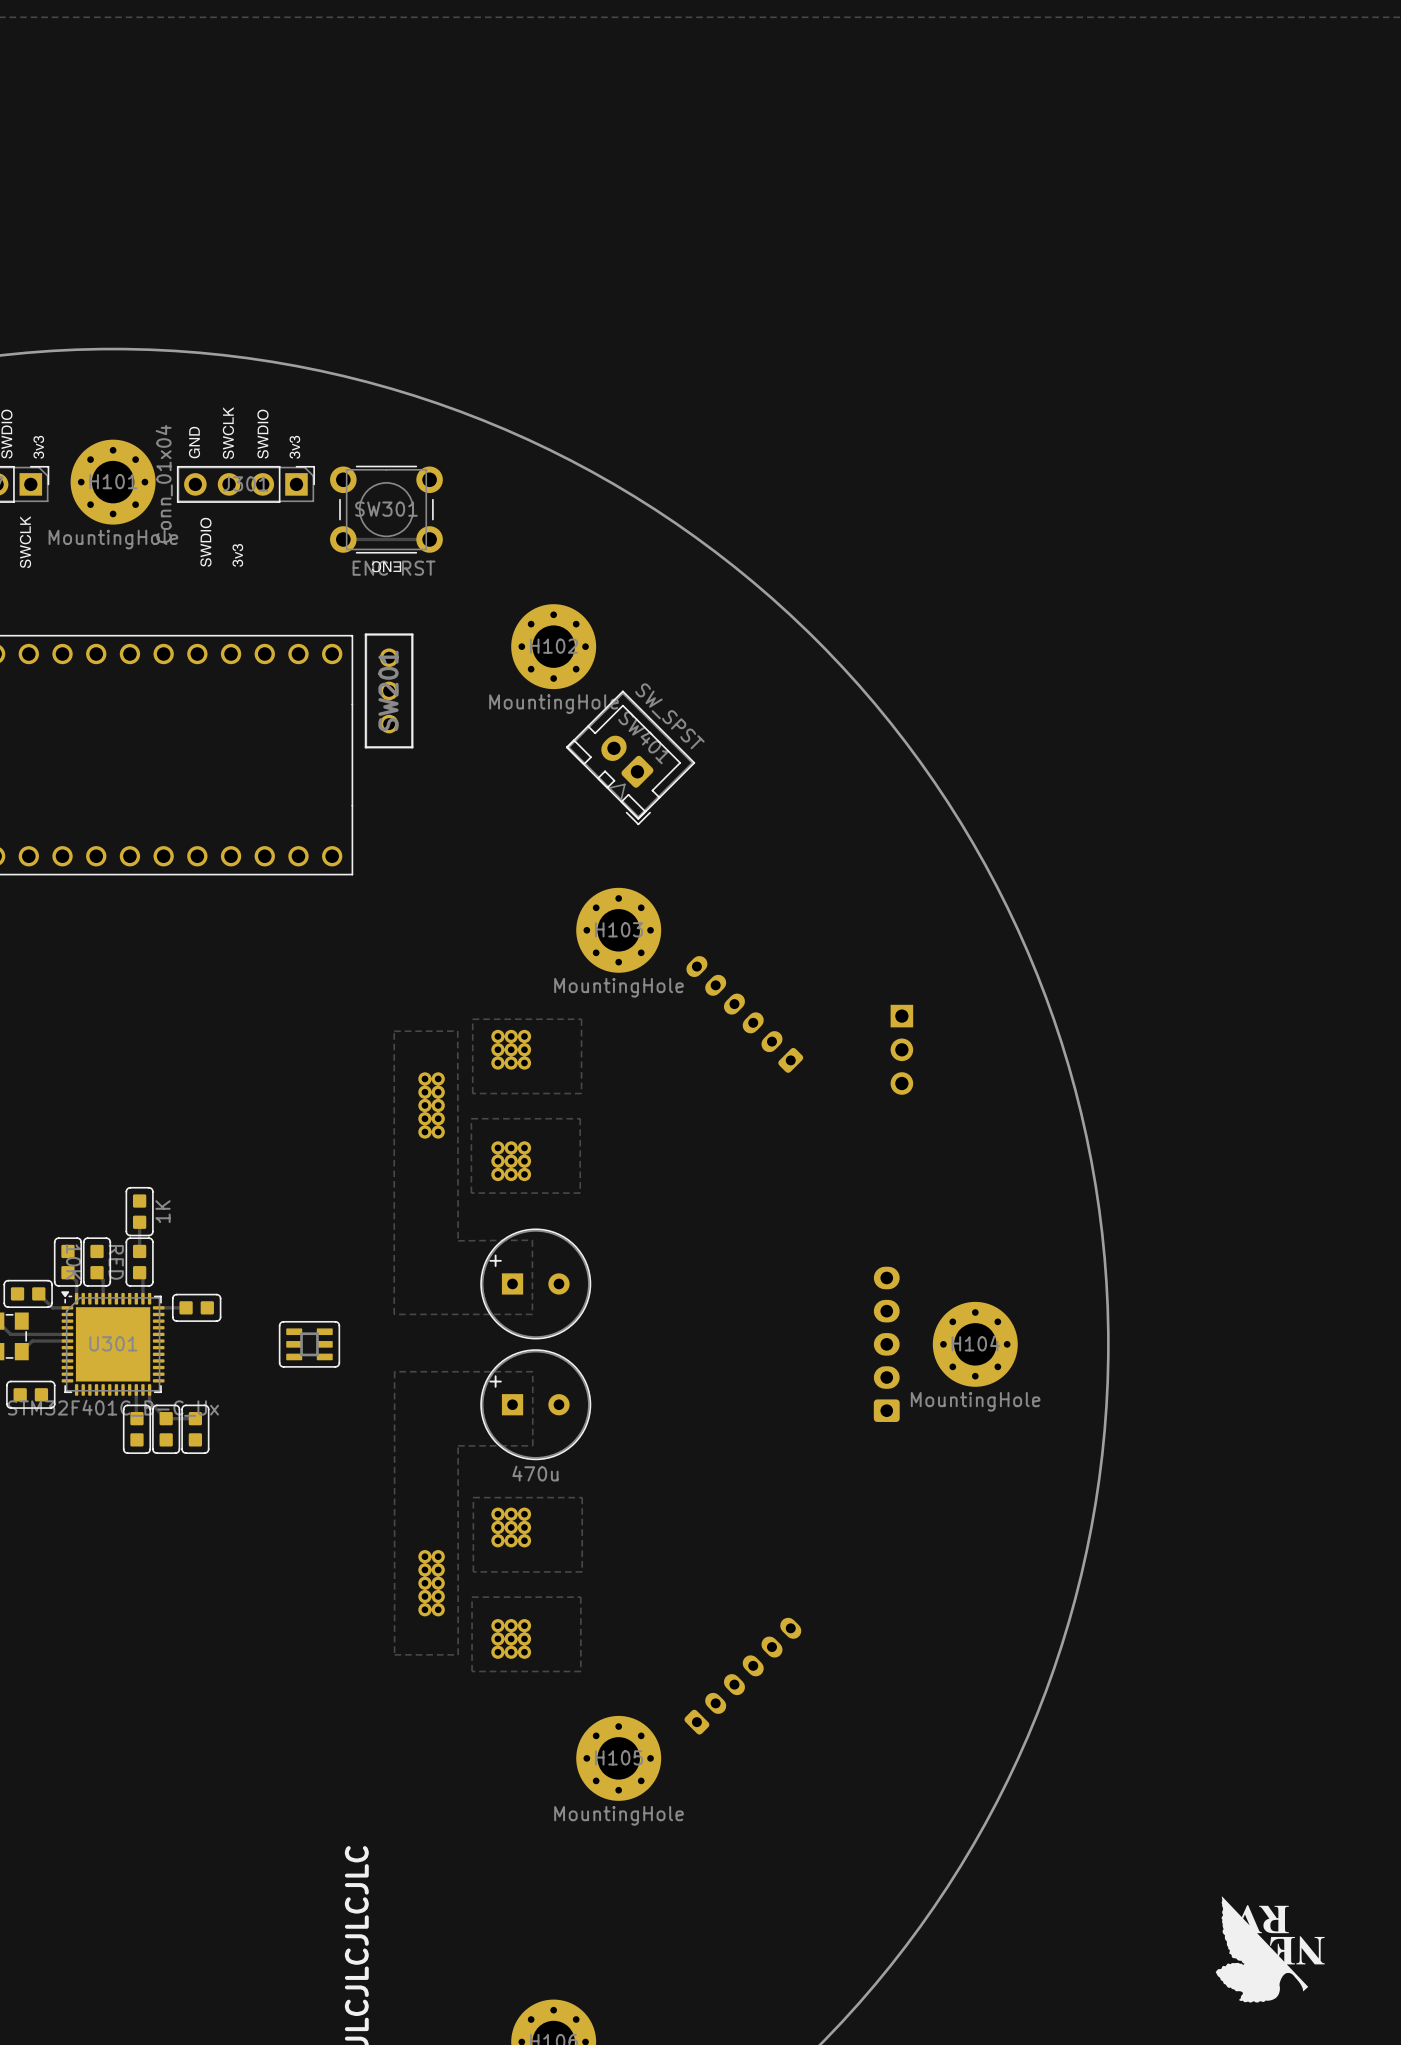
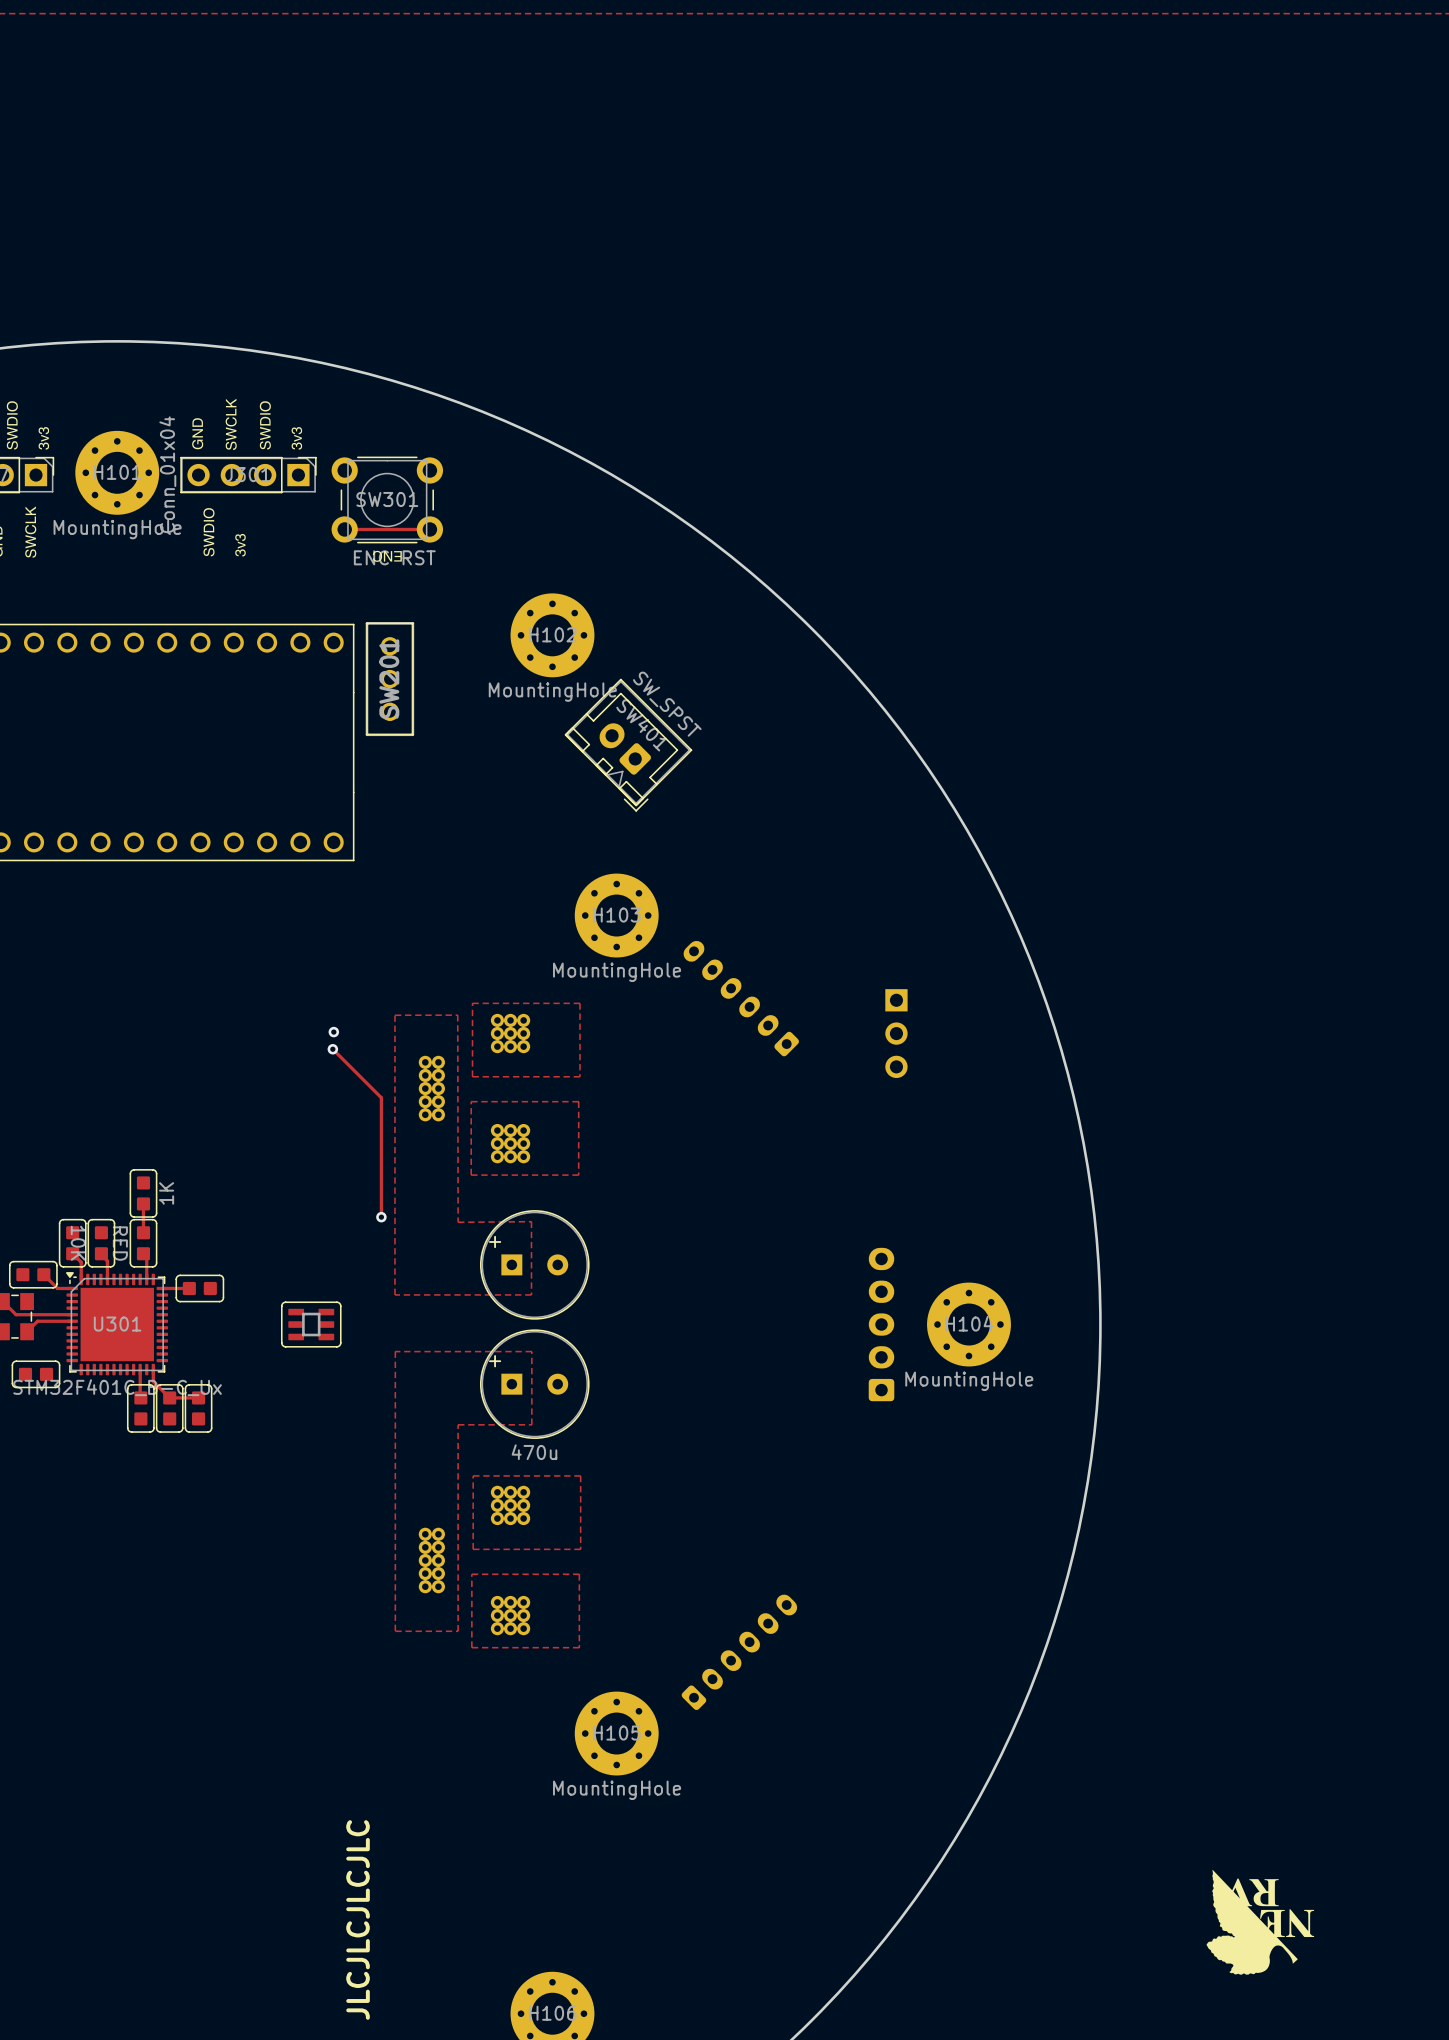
via: none -> (333, 1032)
track: none -> (332, 1049) (381, 1097) (381, 1217)
via: none -> (332, 1049)
via: none -> (381, 1217)

